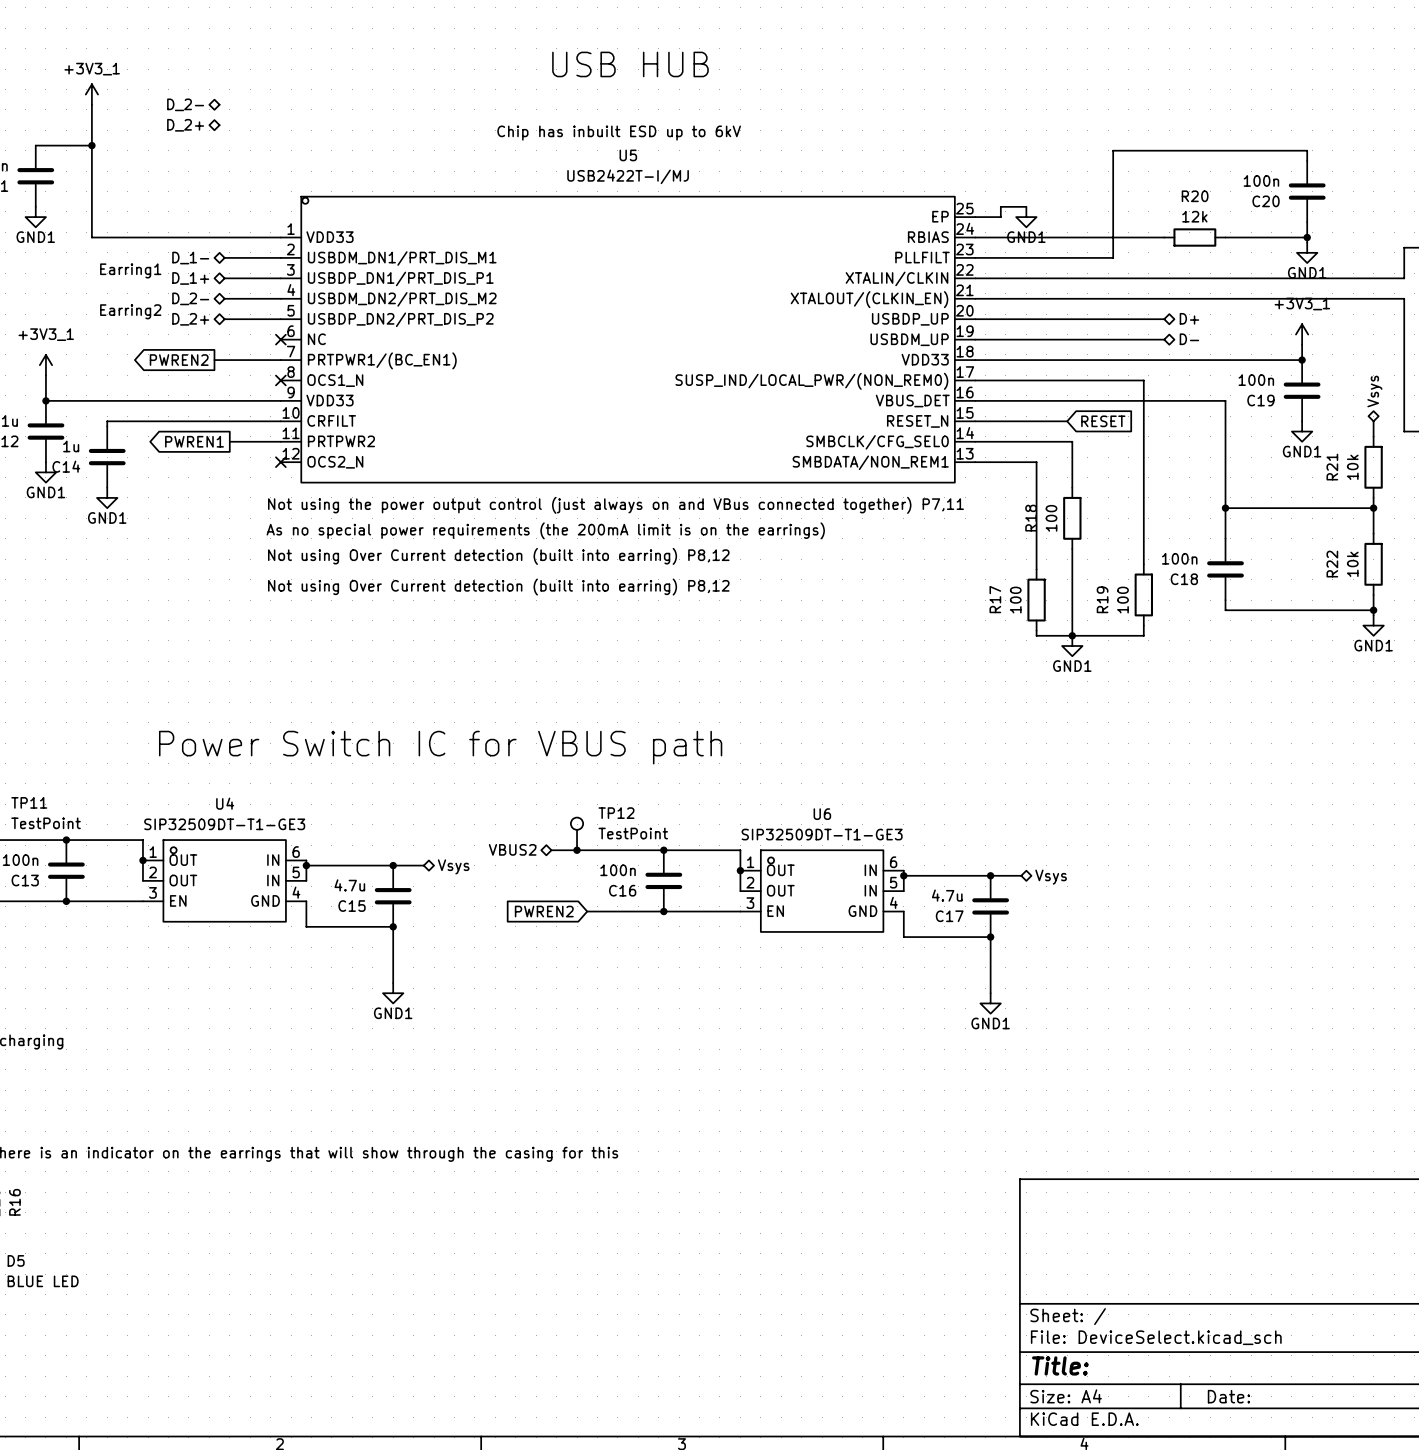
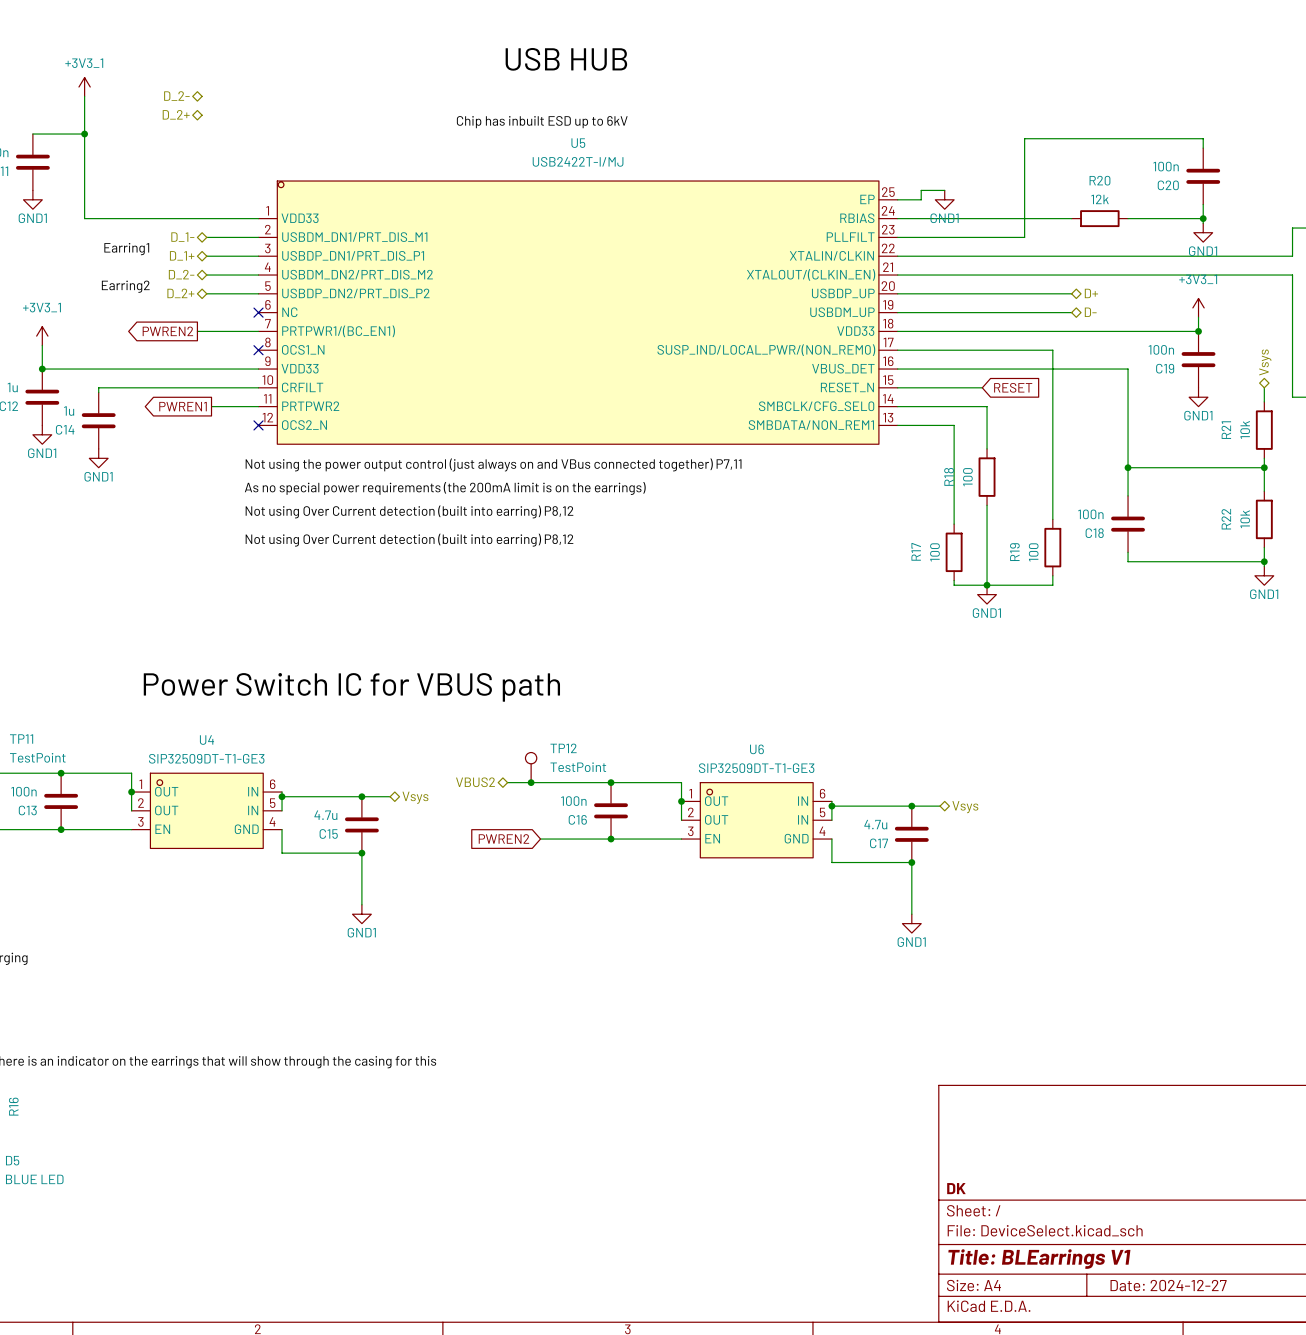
title block: none -> DK (956, 1188)
title block: Title: (1060, 1365) -> Title: BLEarrings V1 (1039, 1259)
title block: Date: (1228, 1396) -> Date: 2024-12-27 (1168, 1285)

